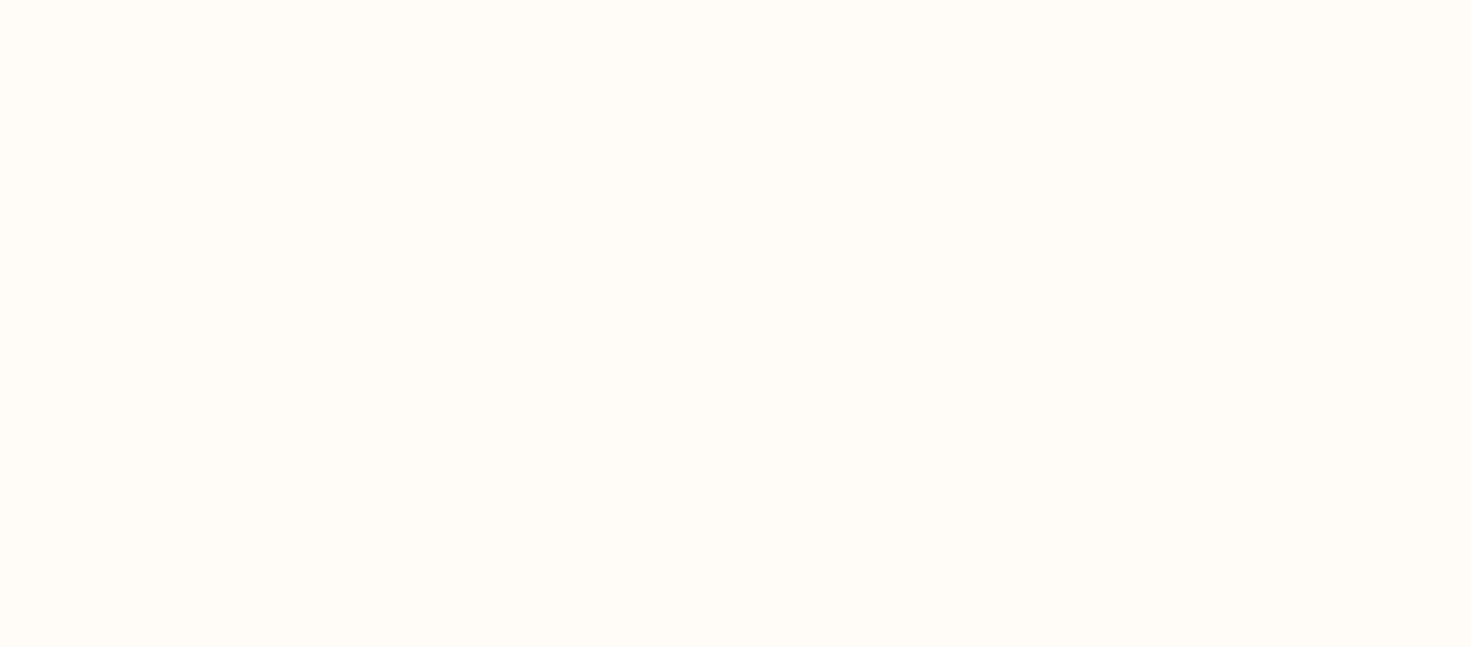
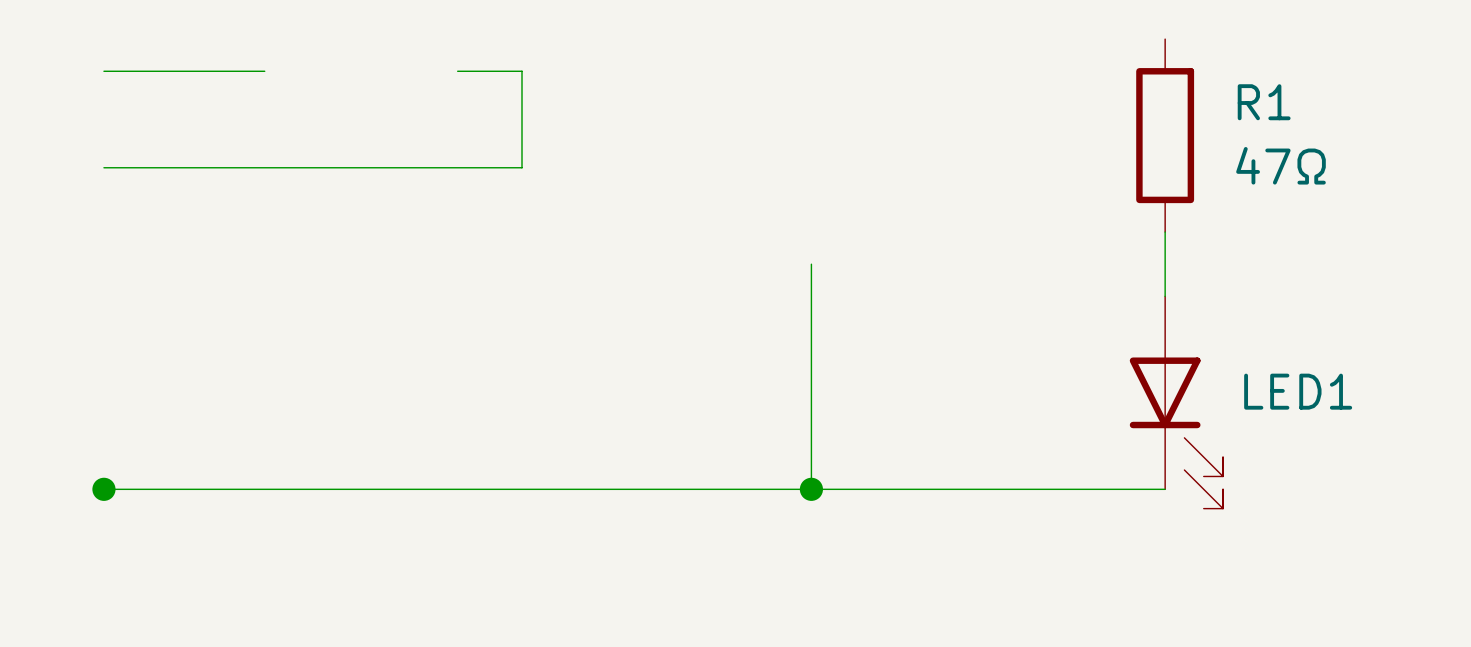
wire: none -> (103, 71) (264, 71)
wire: none -> (457, 71) (522, 71) (522, 167) (103, 167)
R1: none -> 47Ω (1165, 135)
wire: none -> (1165, 232) (1165, 296)
wire: none -> (811, 264) (811, 489)
LED1: none -> (1176, 402)
wire: none -> (103, 489) (1165, 489)
junction: none -> (103, 489)
junction: none -> (811, 489)

